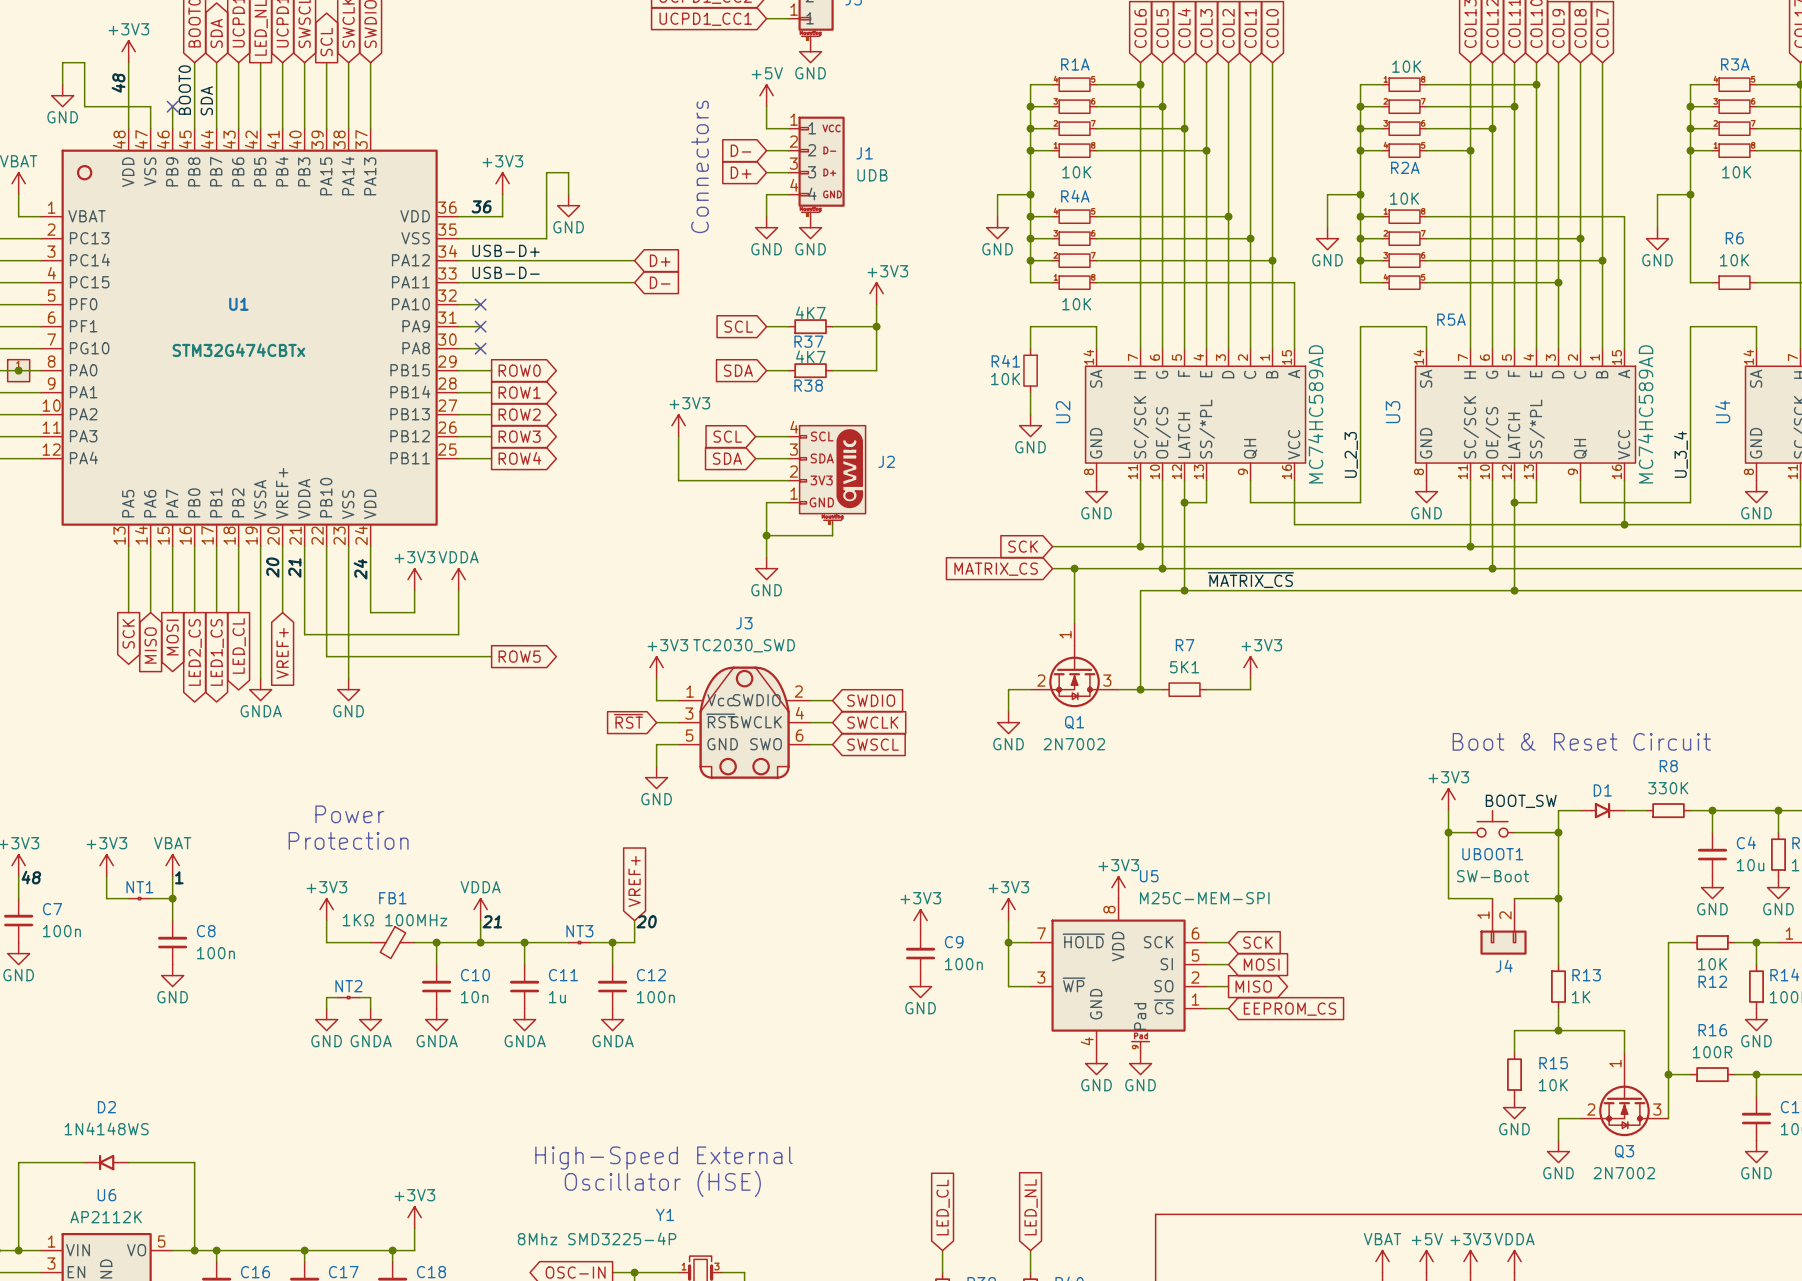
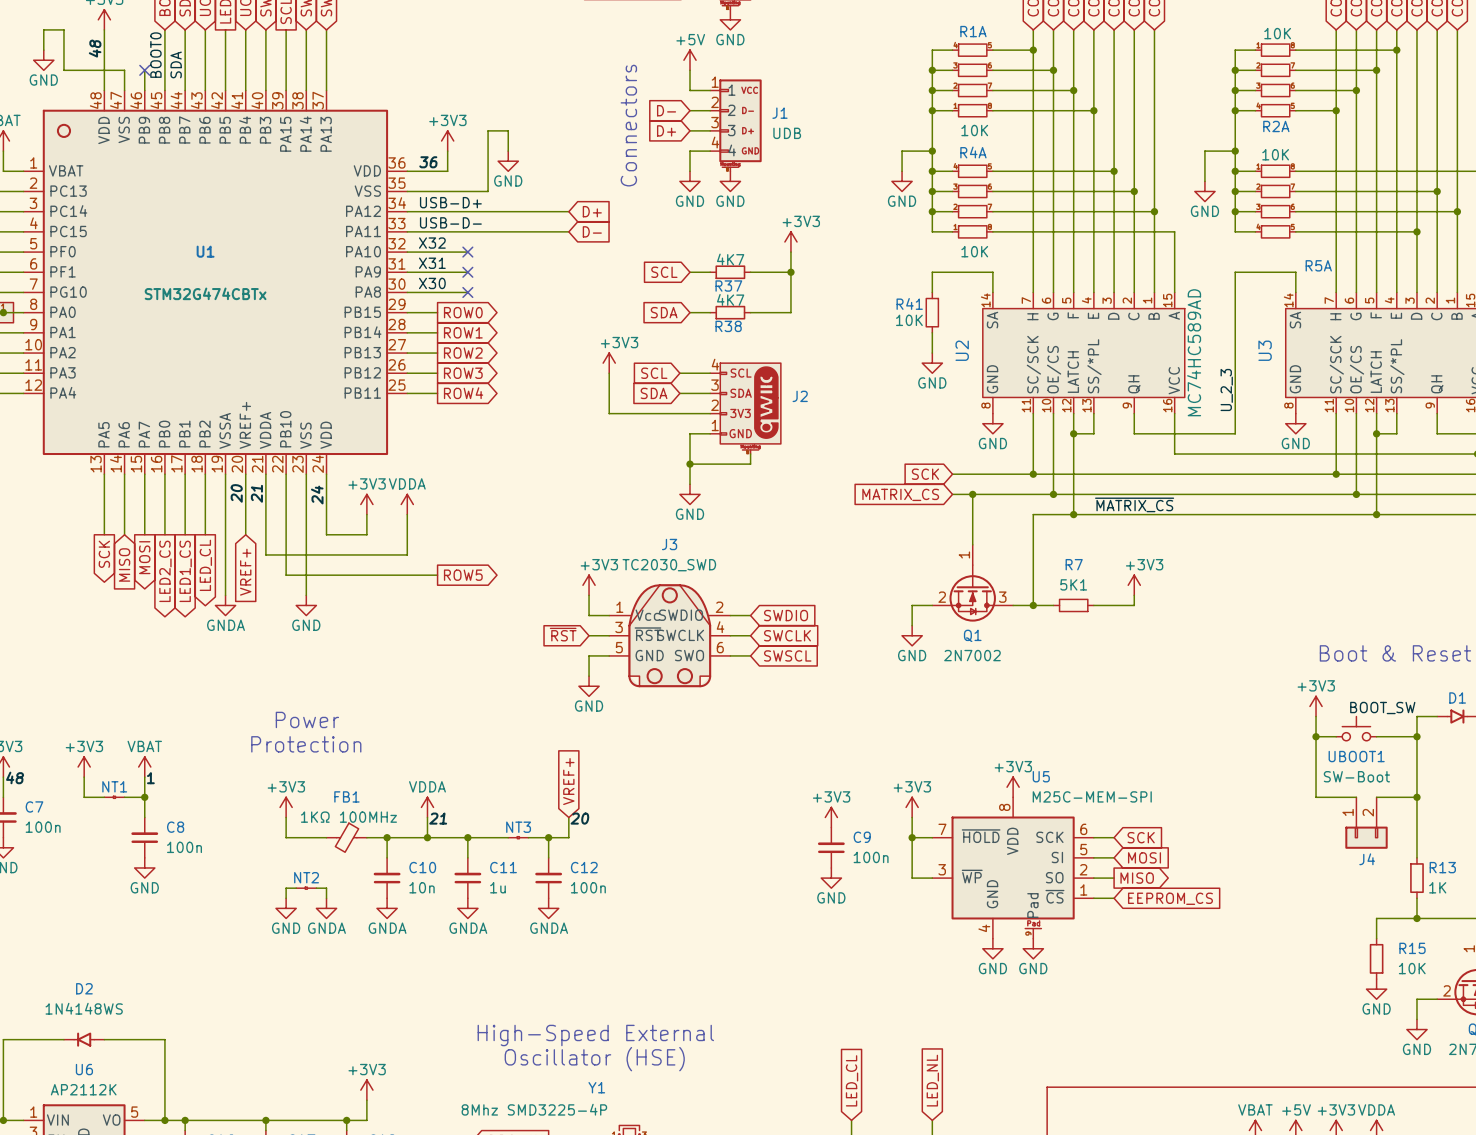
label: none -> X32 (432, 243)
wire: none -> (427, 252) (467, 252)
no-connect mark: (480, 304) -> none
no-connect mark: none -> (467, 252)
label: none -> X31 (432, 263)
wire: none -> (427, 272) (467, 272)
no-connect mark: (480, 326) -> none
no-connect mark: none -> (467, 272)
label: none -> X30 (432, 283)
wire: none -> (427, 292) (467, 292)
no-connect mark: (480, 348) -> none
no-connect mark: none -> (467, 292)

